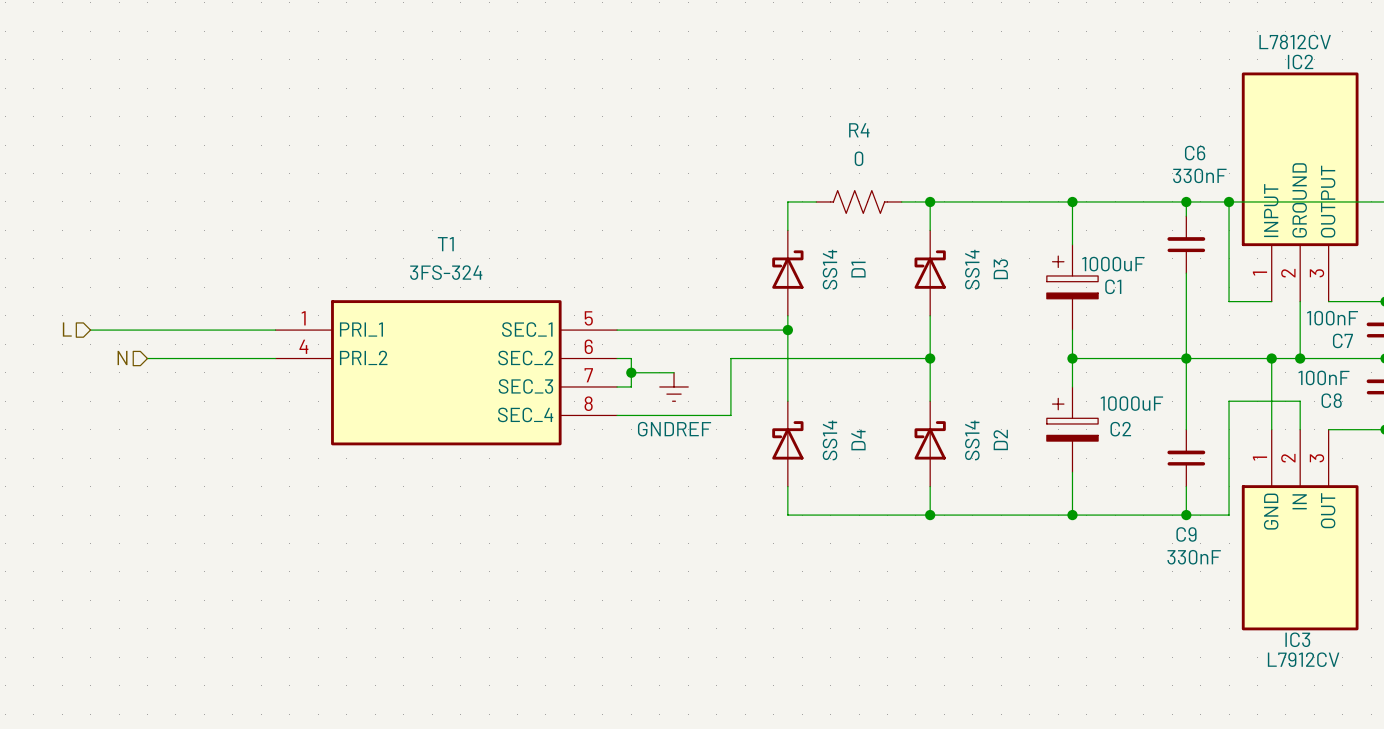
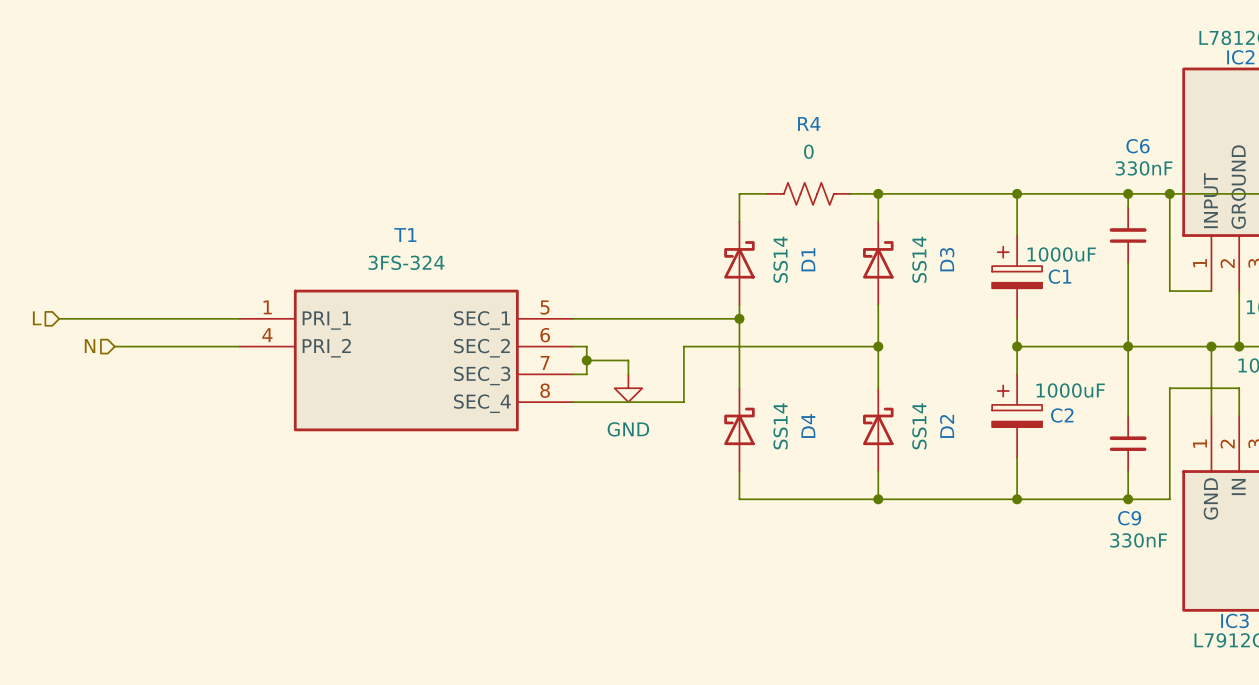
power symbol: GNDREF (674, 386) -> none
power symbol: none -> GND (628, 388)

